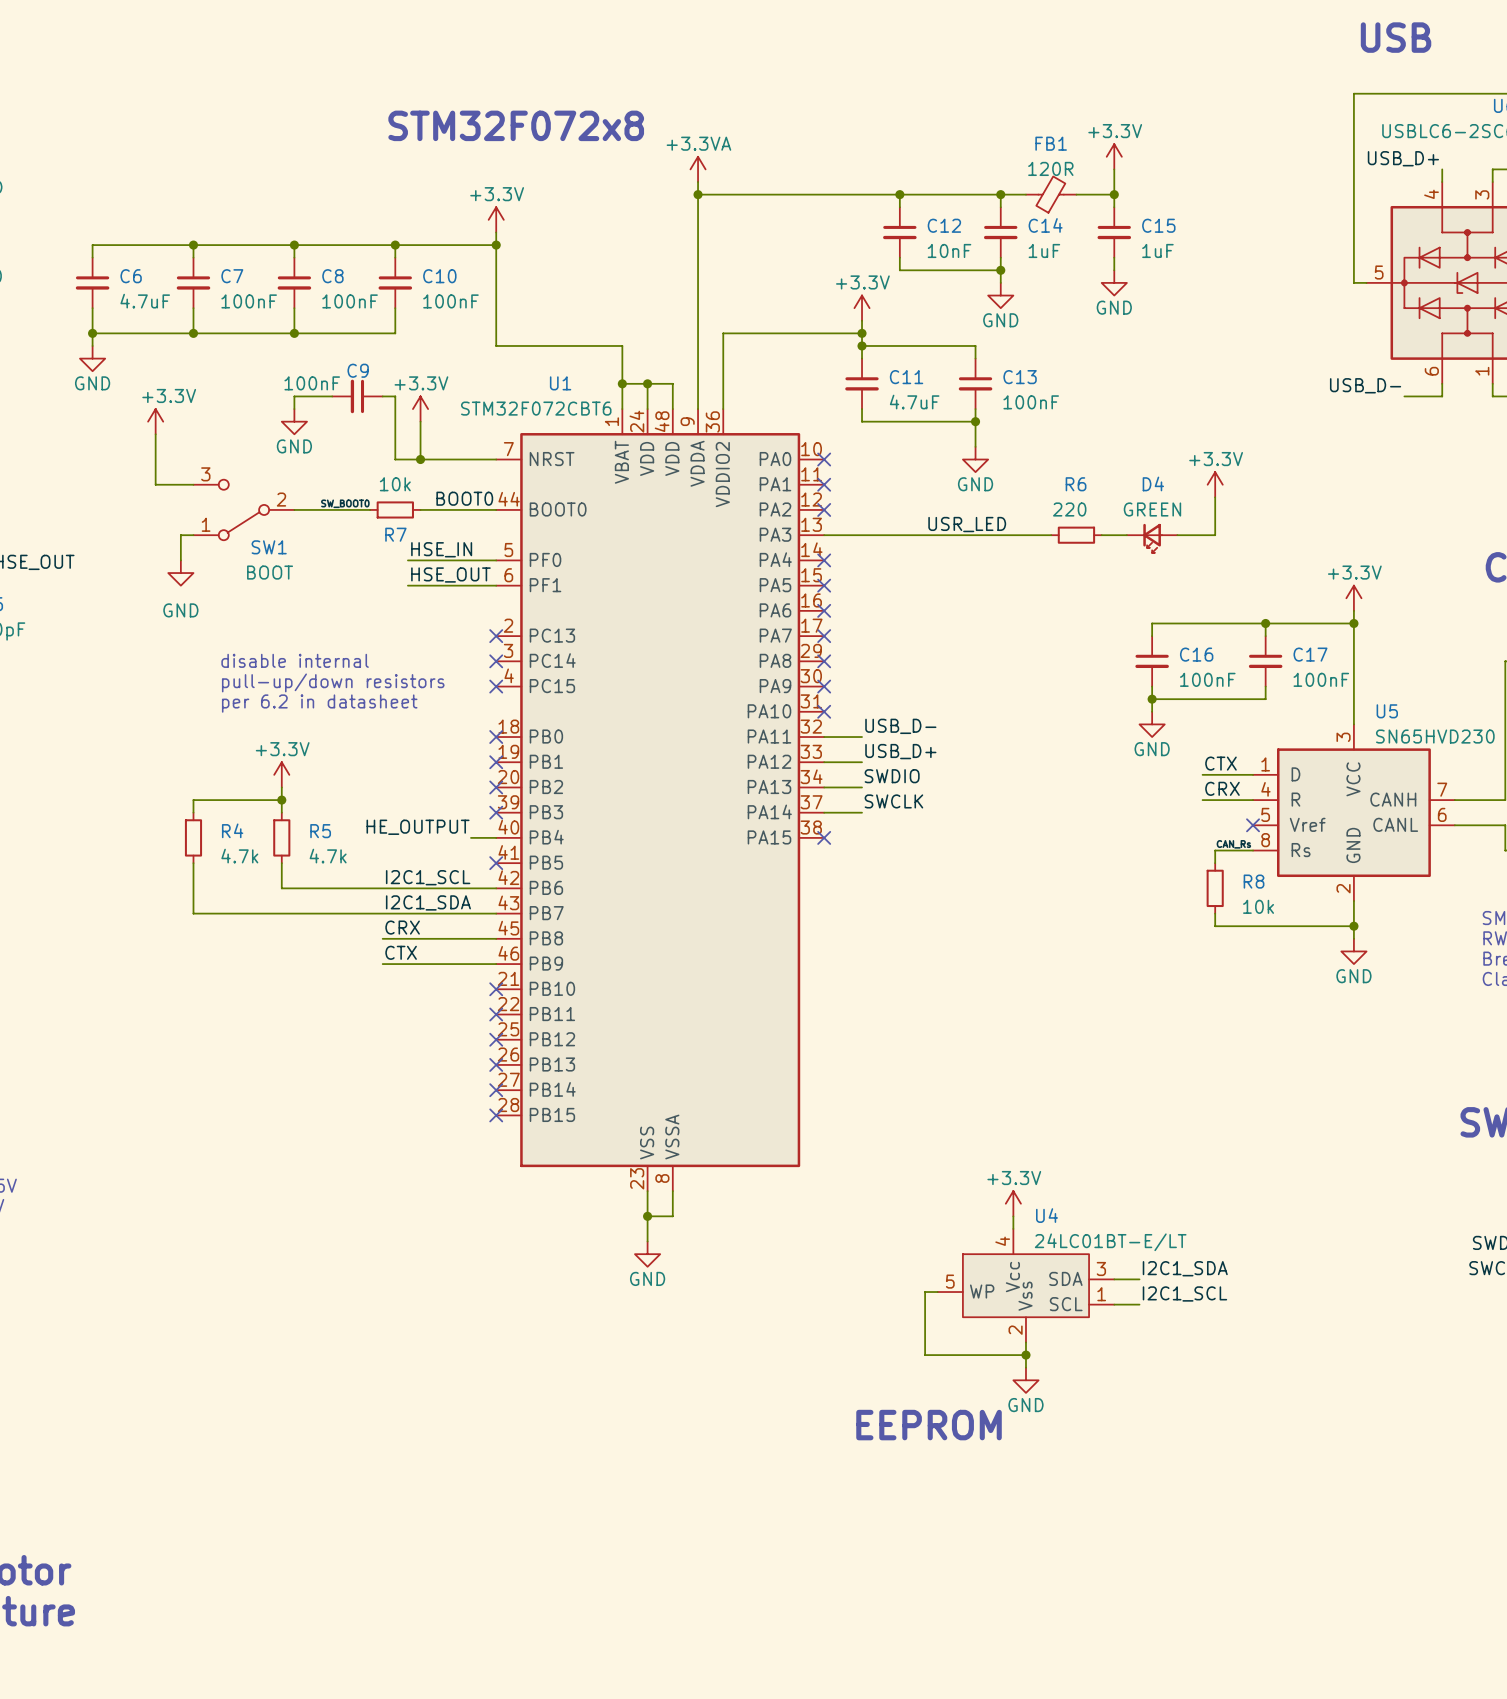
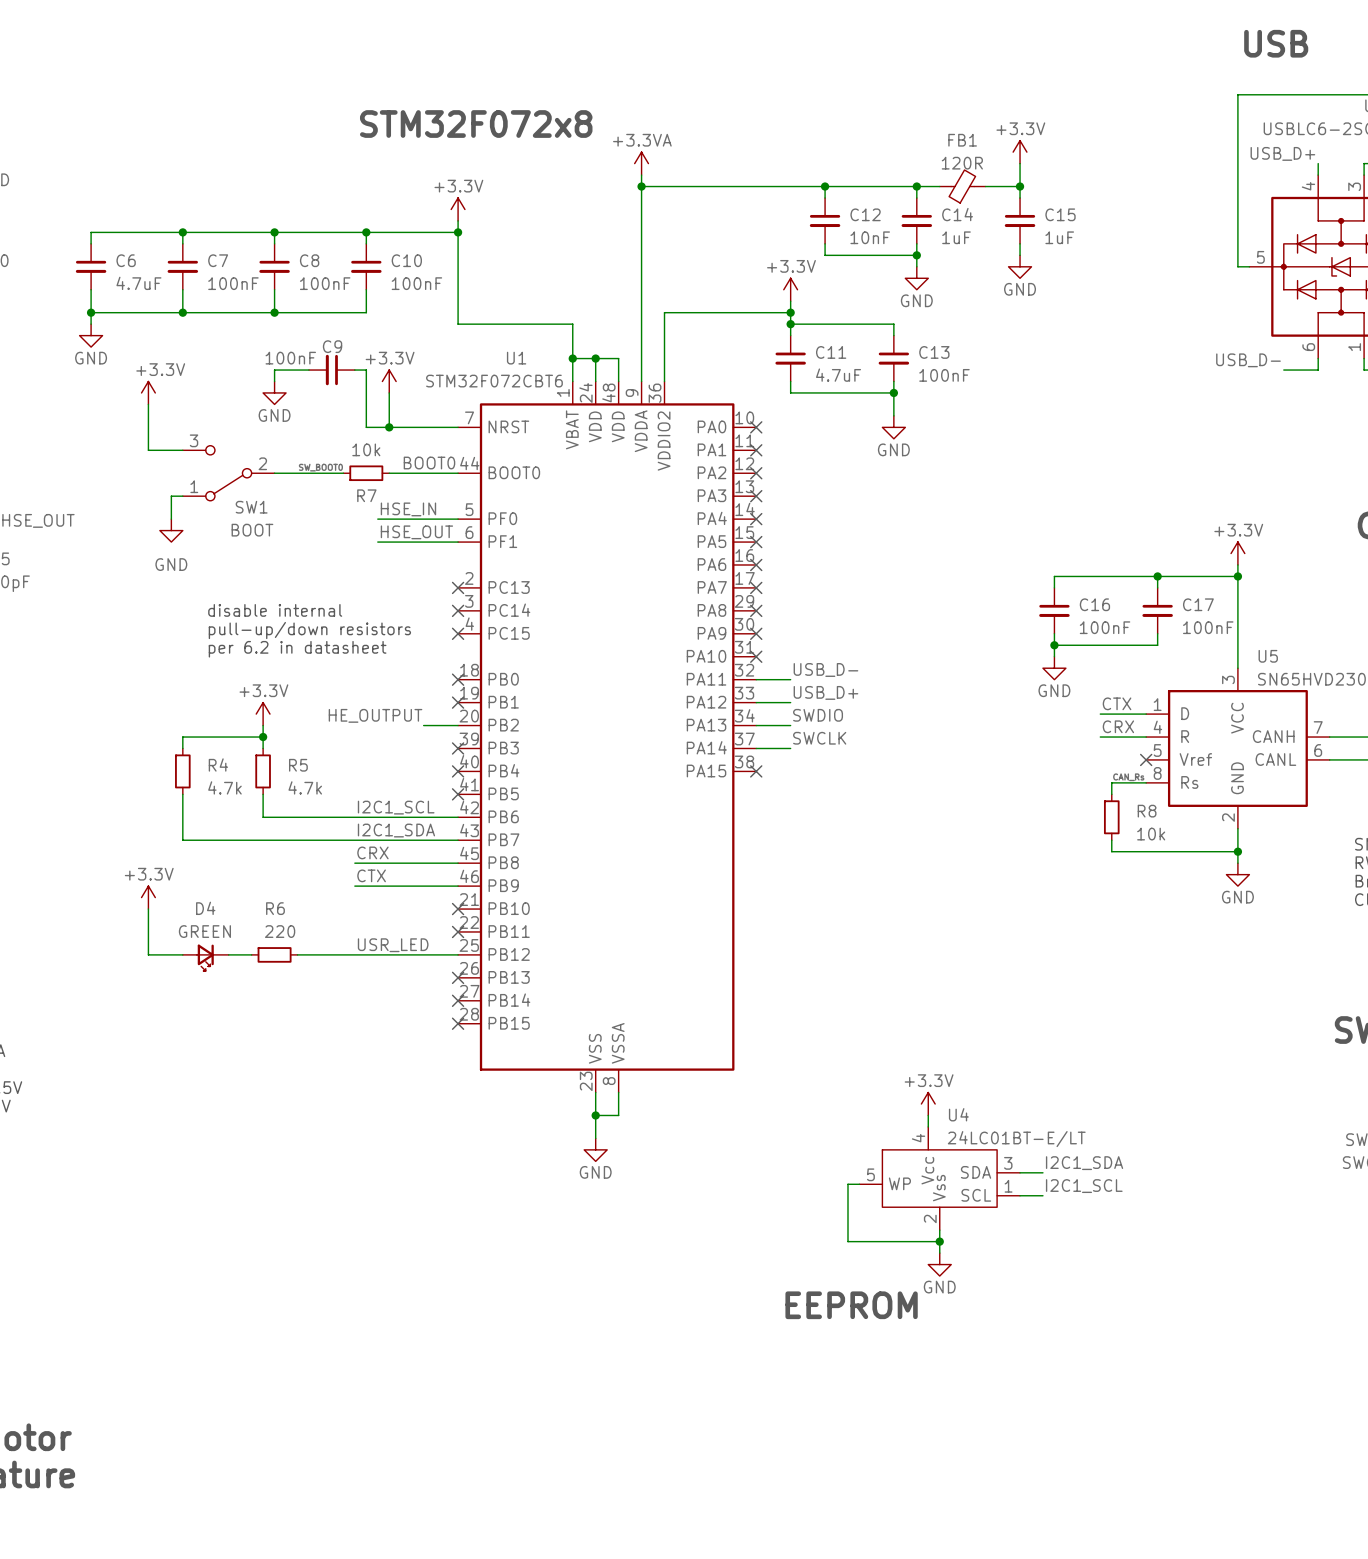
R6 name position: R6 (1076, 484) -> R6 (275, 908)
power symbol: +3.3V (1215, 484) -> none
wire: (1215, 497) (1215, 535) (1177, 535) -> none
R6 value position: 220 (1069, 509) -> 220 (280, 931)
label: USR_LED (967, 524) -> none
wire: (824, 535) (1051, 535) -> none
no-connect mark: none -> (756, 496)
R6 position: (1076, 535) -> (274, 954)
wire: (1101, 535) (1126, 535) -> none
D4 flip: as is (1152, 538) -> left-right (205, 957)
D4 position: (1152, 538) -> (205, 957)
wire: none -> (423, 725) (458, 725)
no-connect mark position: (496, 787) -> (458, 771)
label position: HE_OUTPUT (418, 827) -> HE_OUTPUT (375, 715)
wire: (470, 837) (496, 837) -> none
power symbol: none -> +3.3V (148, 897)
wire: none -> (148, 909) (148, 954) (182, 954)
label: none -> USR_LED (393, 945)
wire: none -> (228, 954) (251, 954)
wire: none -> (297, 954) (458, 954)
no-connect mark: (496, 1039) -> none

